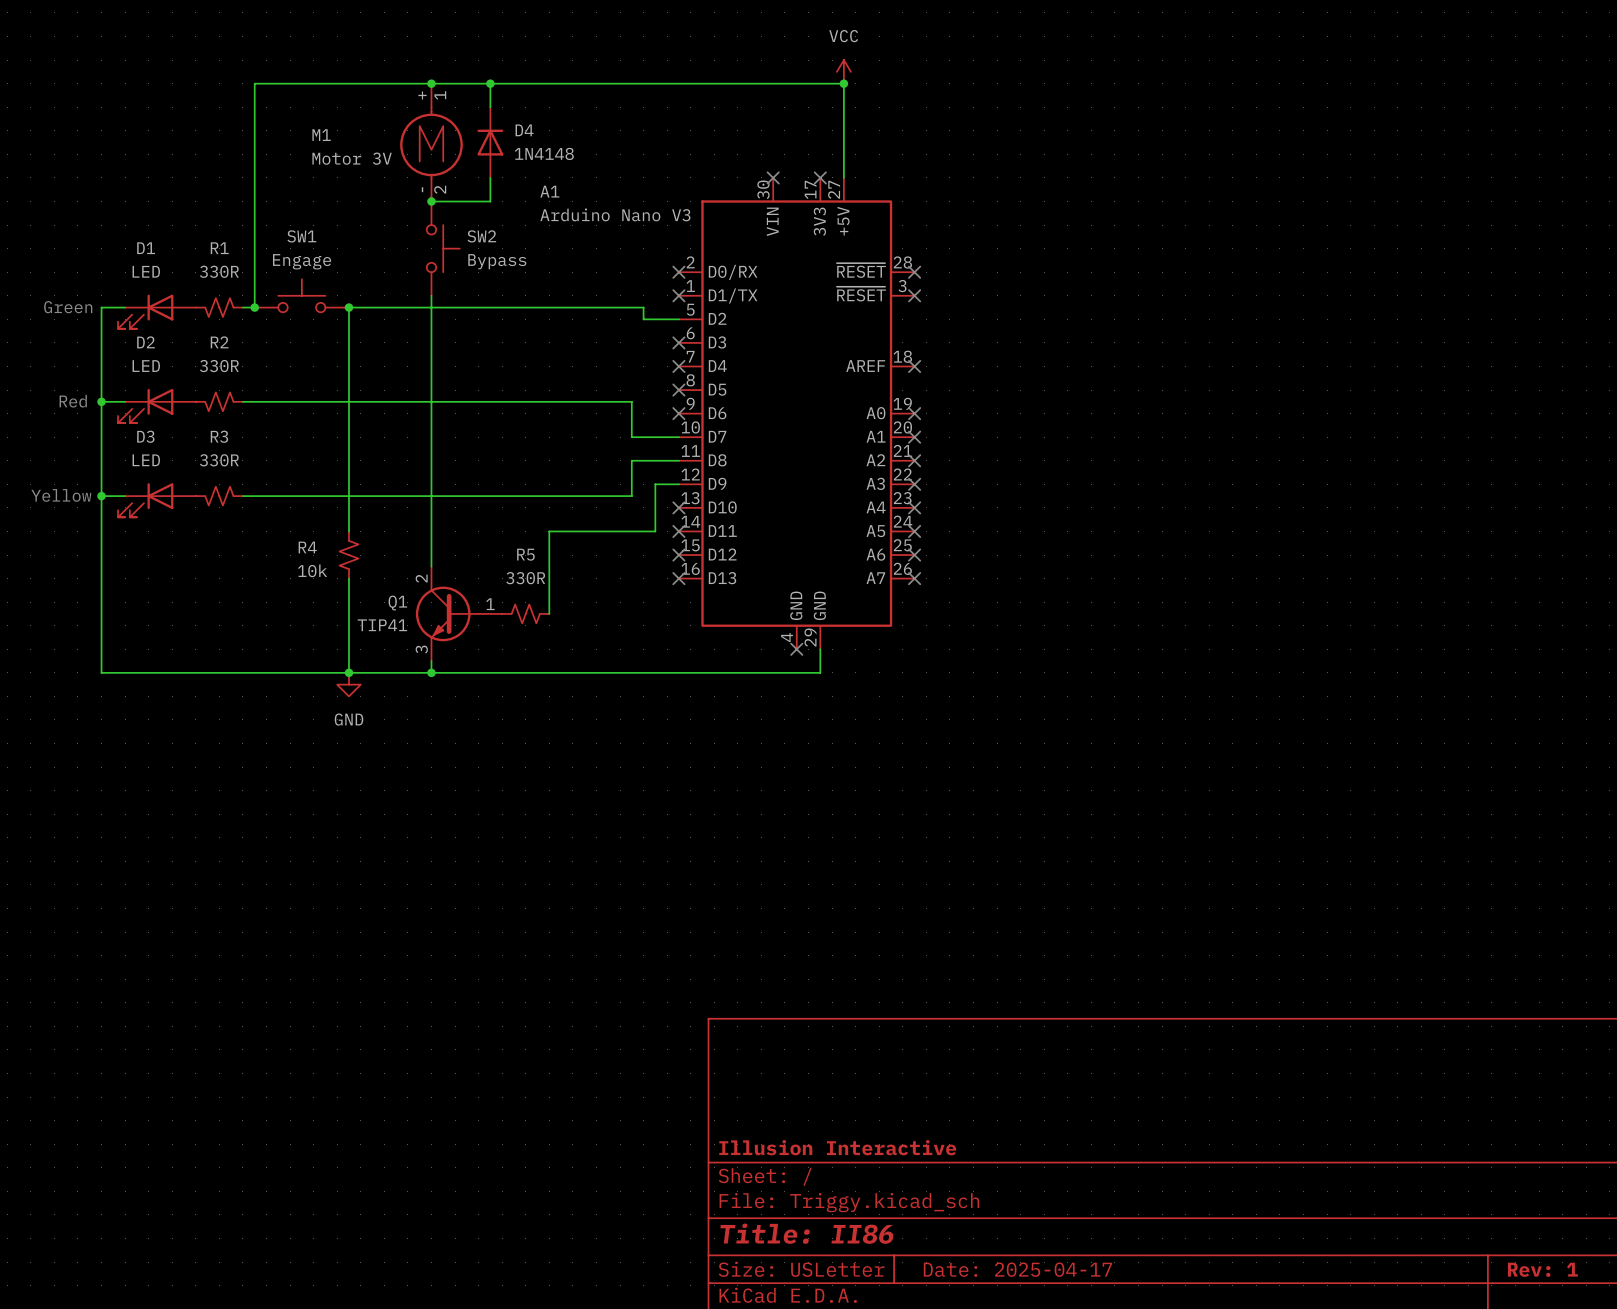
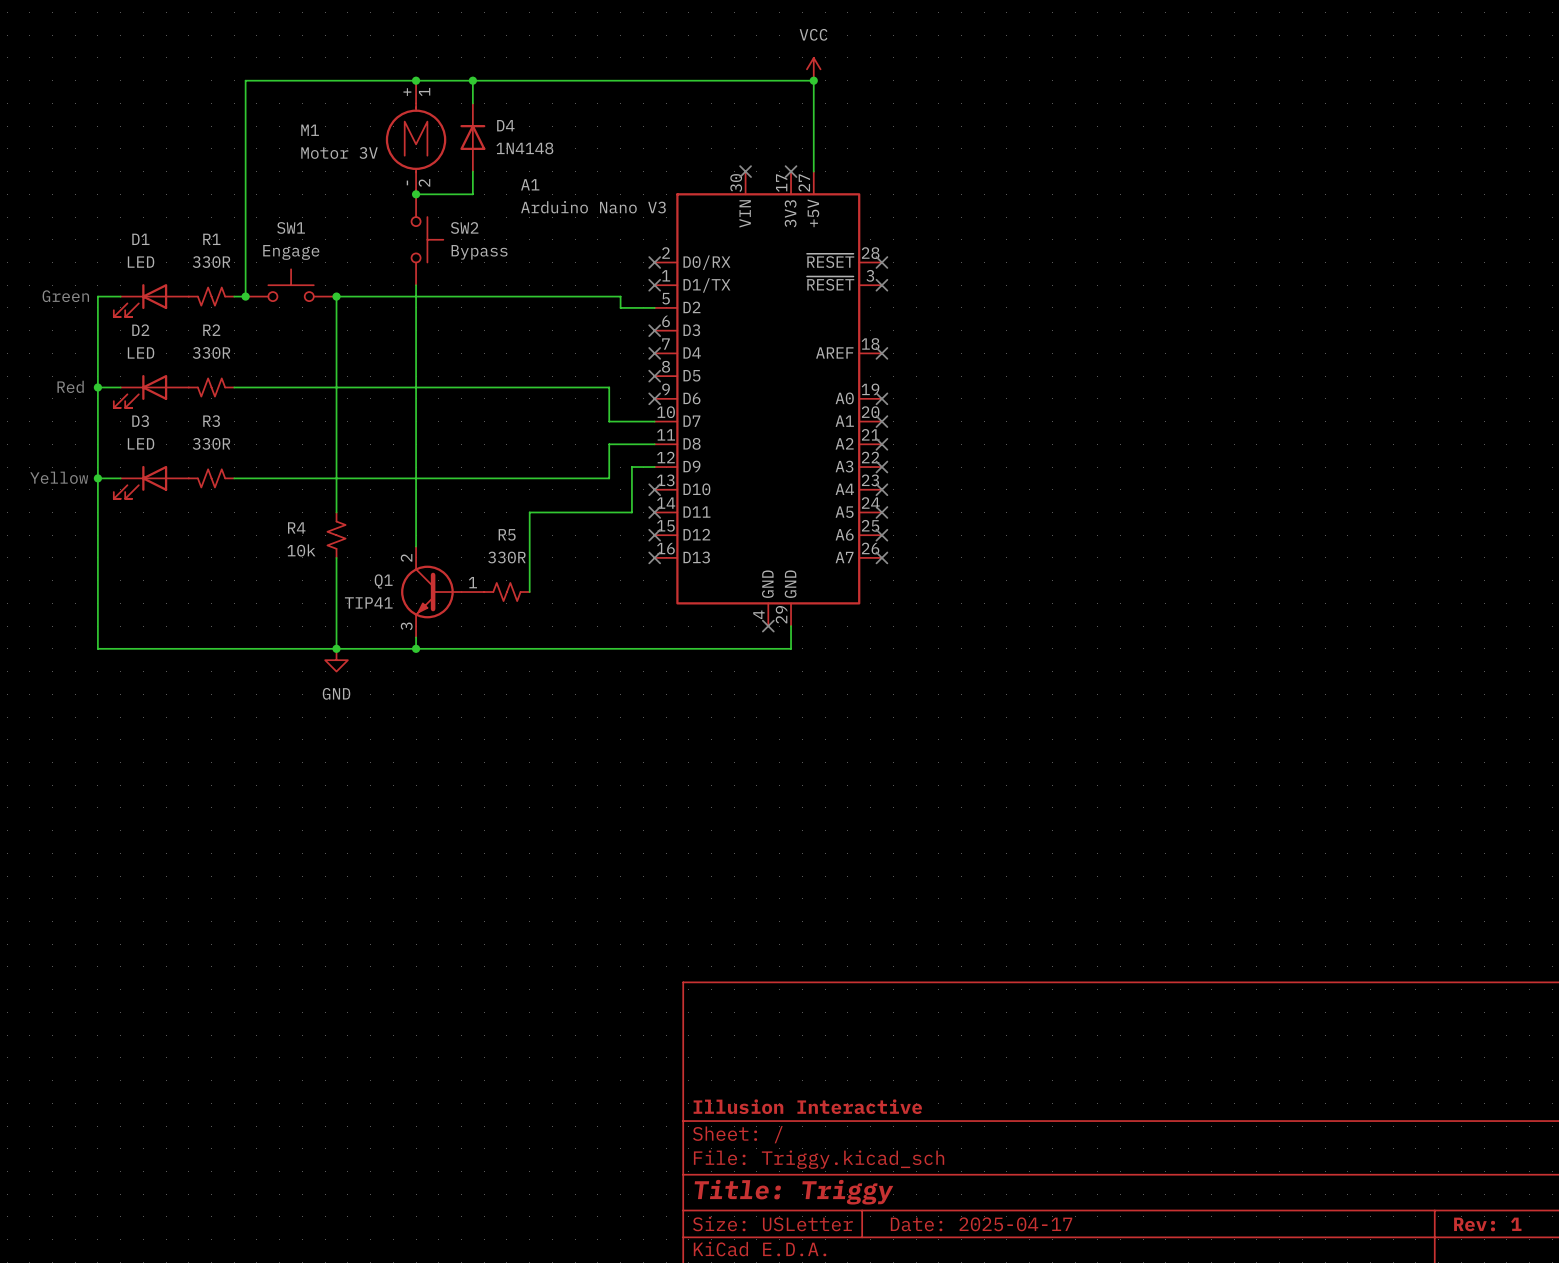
title block: Title: II86 (806, 1233) -> Title: Triggy (793, 1192)

